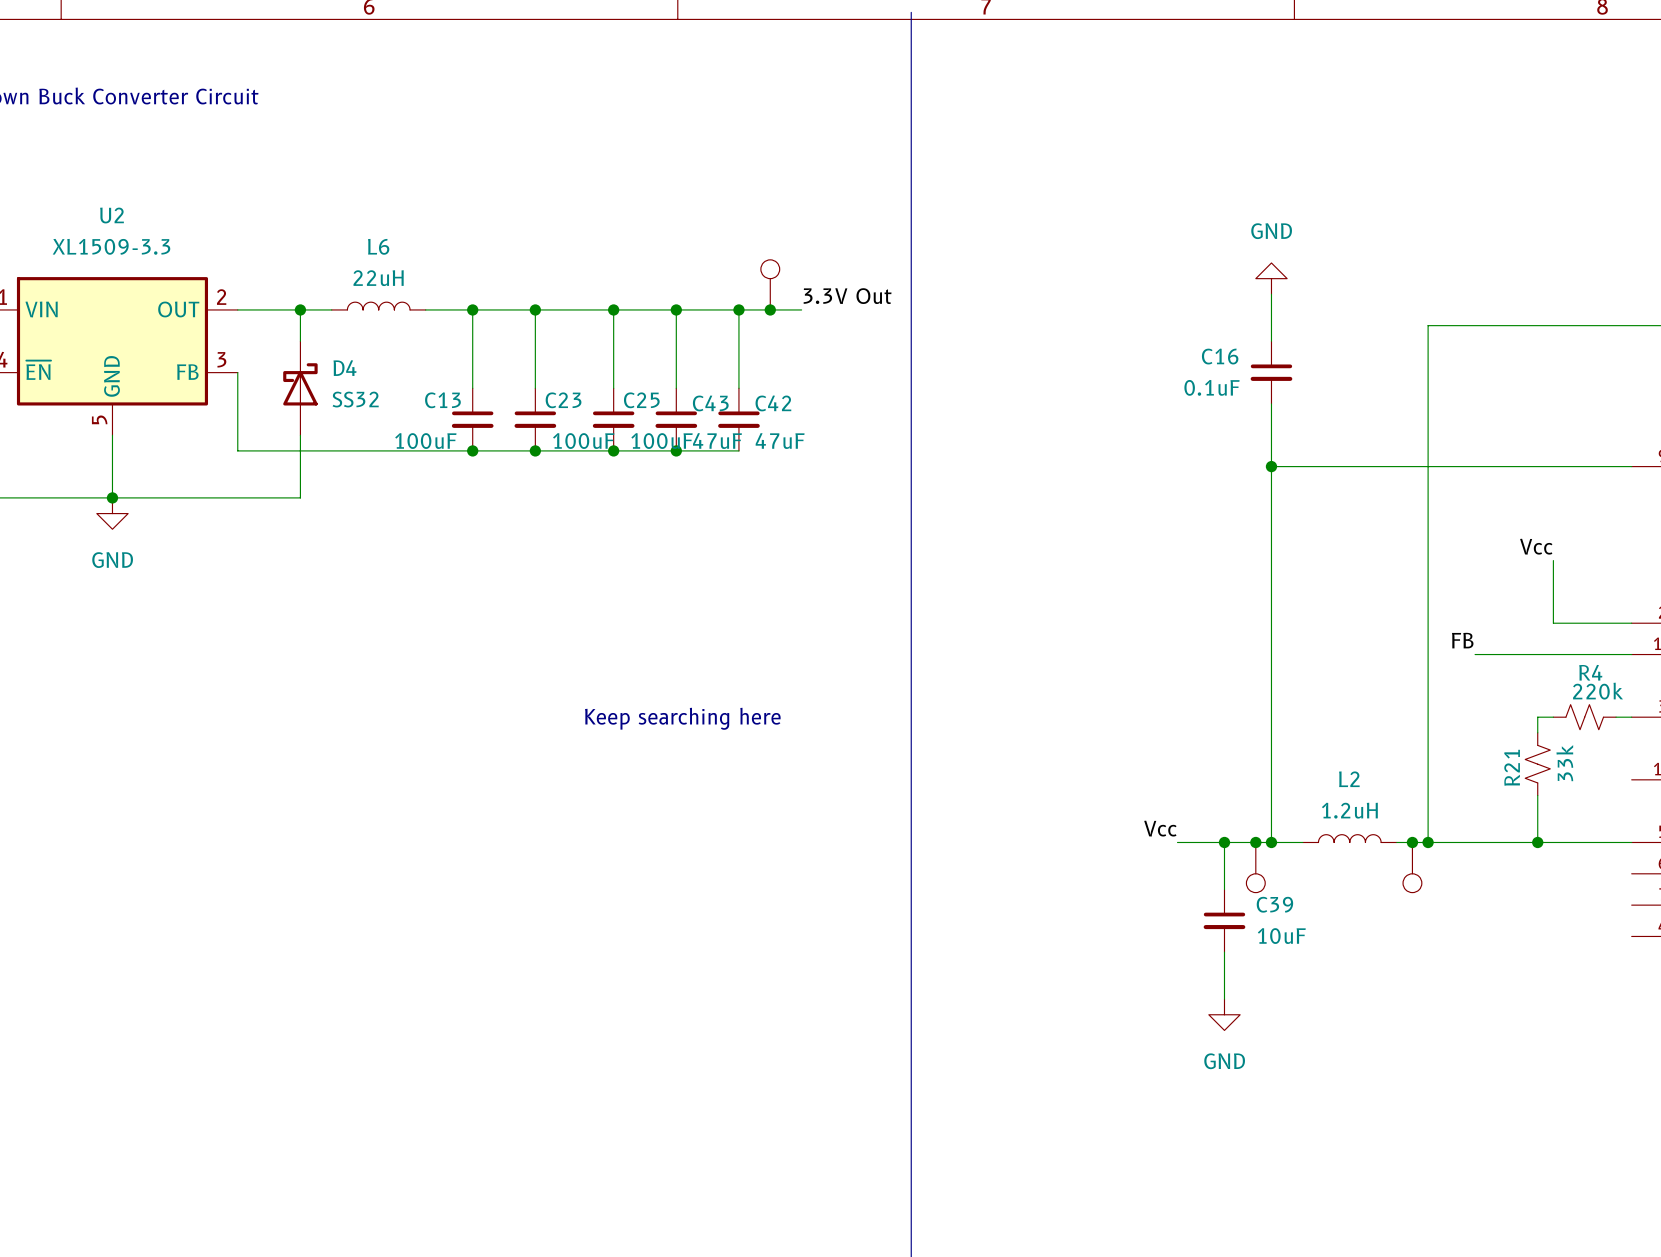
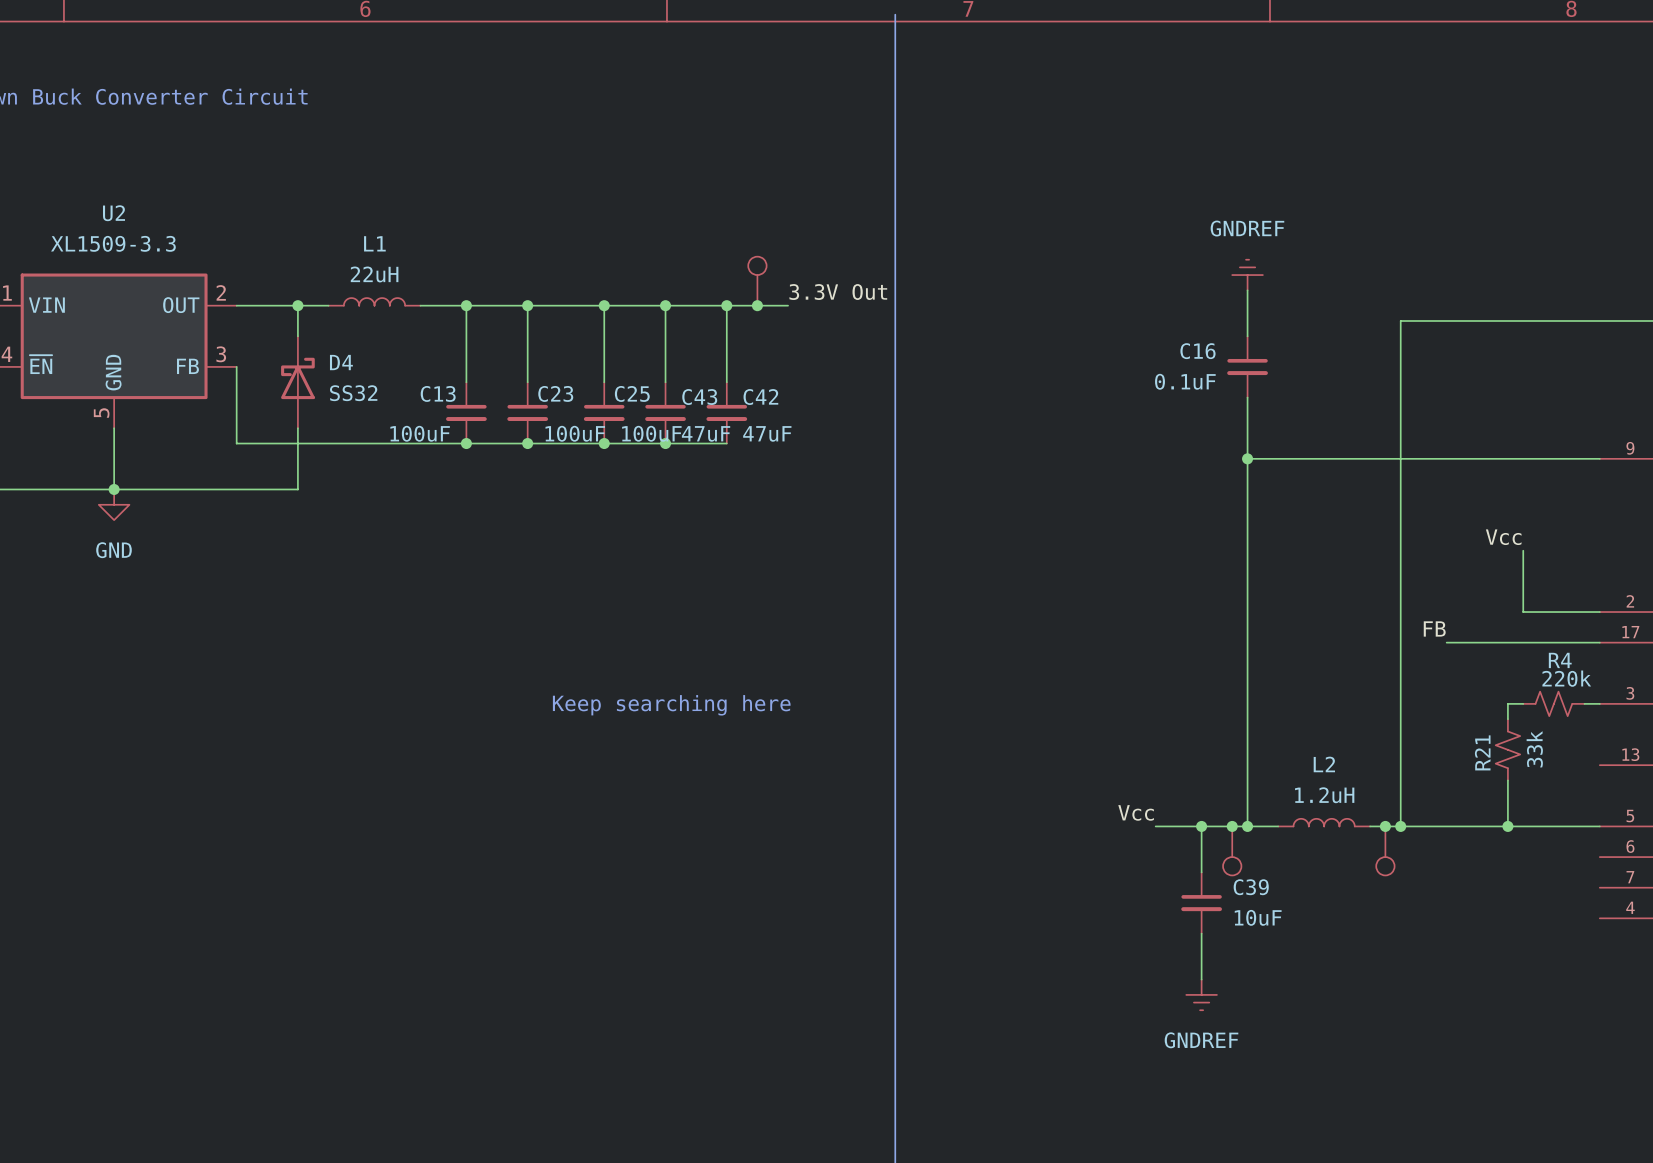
L6 name: L6 (378, 246) -> L1 (374, 243)
power symbol: GND (1271, 278) -> GNDREF (1247, 275)
power symbol: GND (1224, 1014) -> GNDREF (1201, 994)

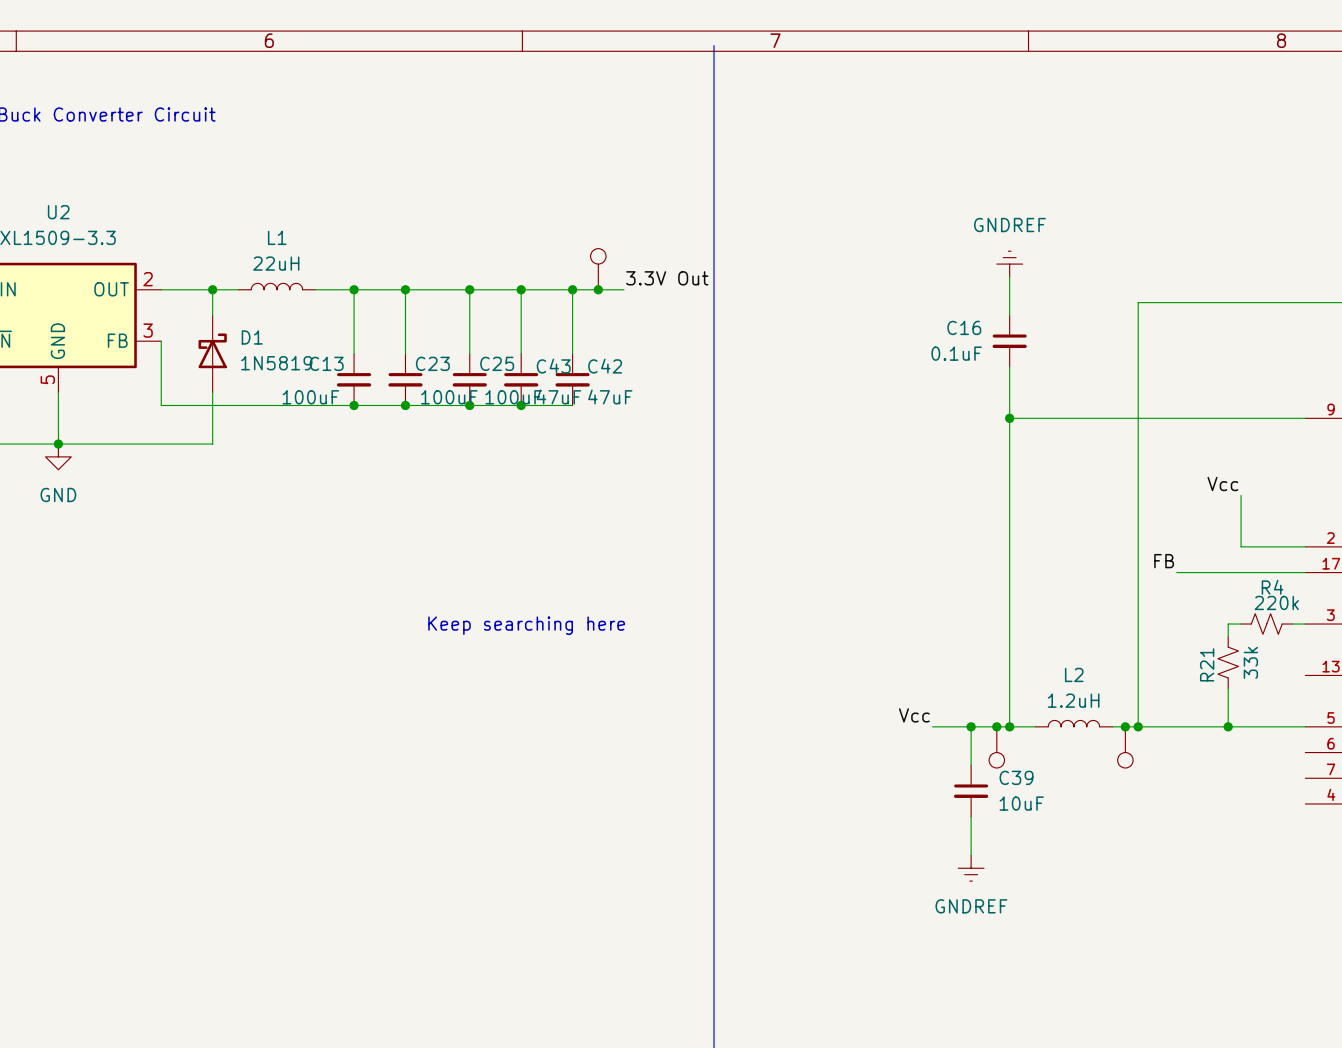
D4 name: D4 (341, 362) -> D1 (252, 337)
D4 value: SS32 (353, 393) -> 1N5819 (276, 363)

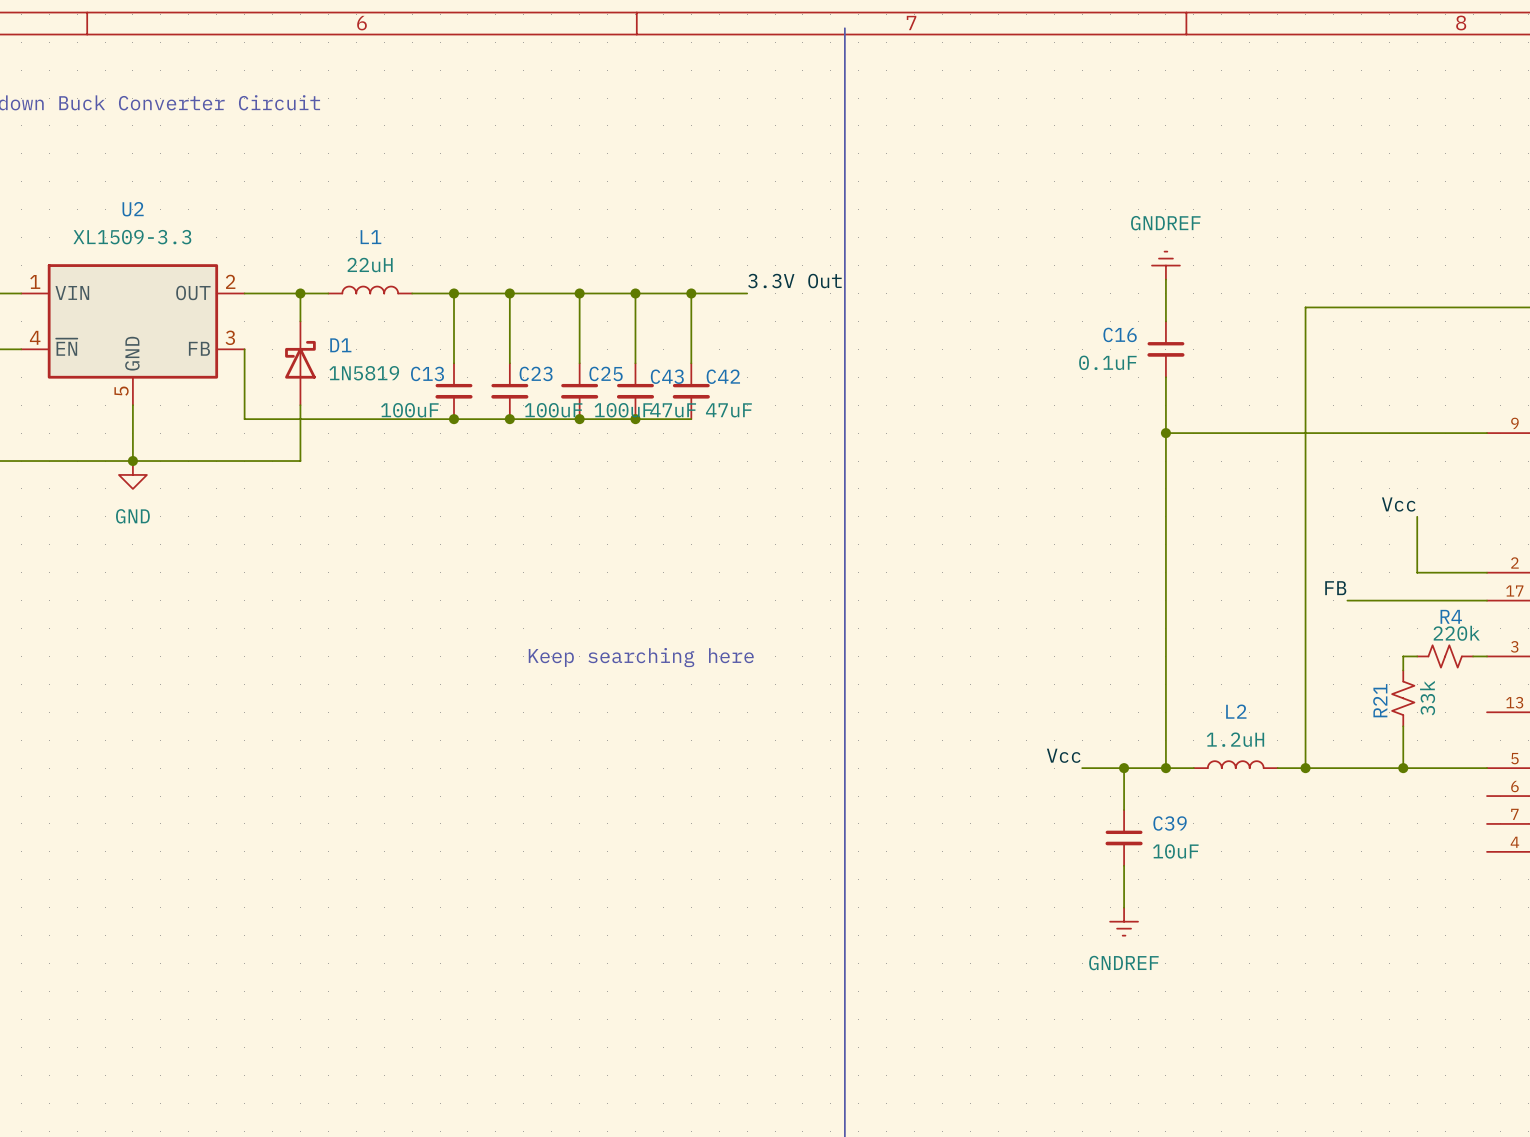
part: (598, 269) -> none
junction: (598, 289) -> none
junction: (996, 726) -> none
junction: (1125, 726) -> none
part: (996, 747) -> none
part: (1125, 747) -> none

